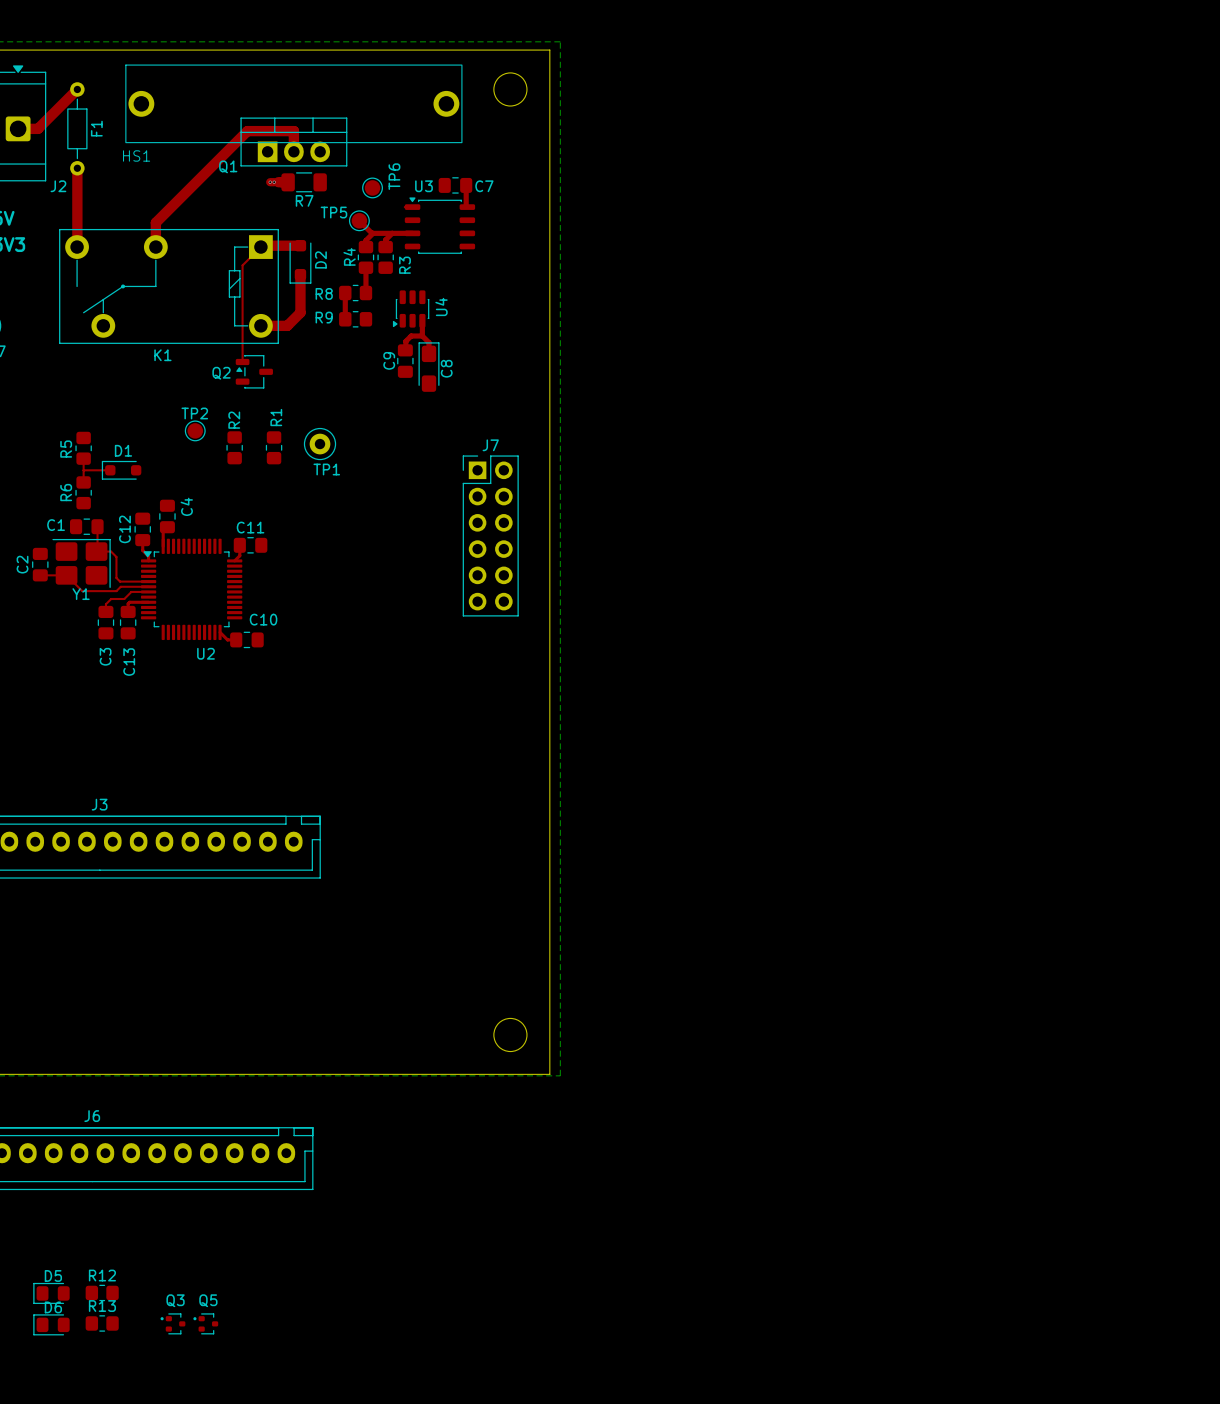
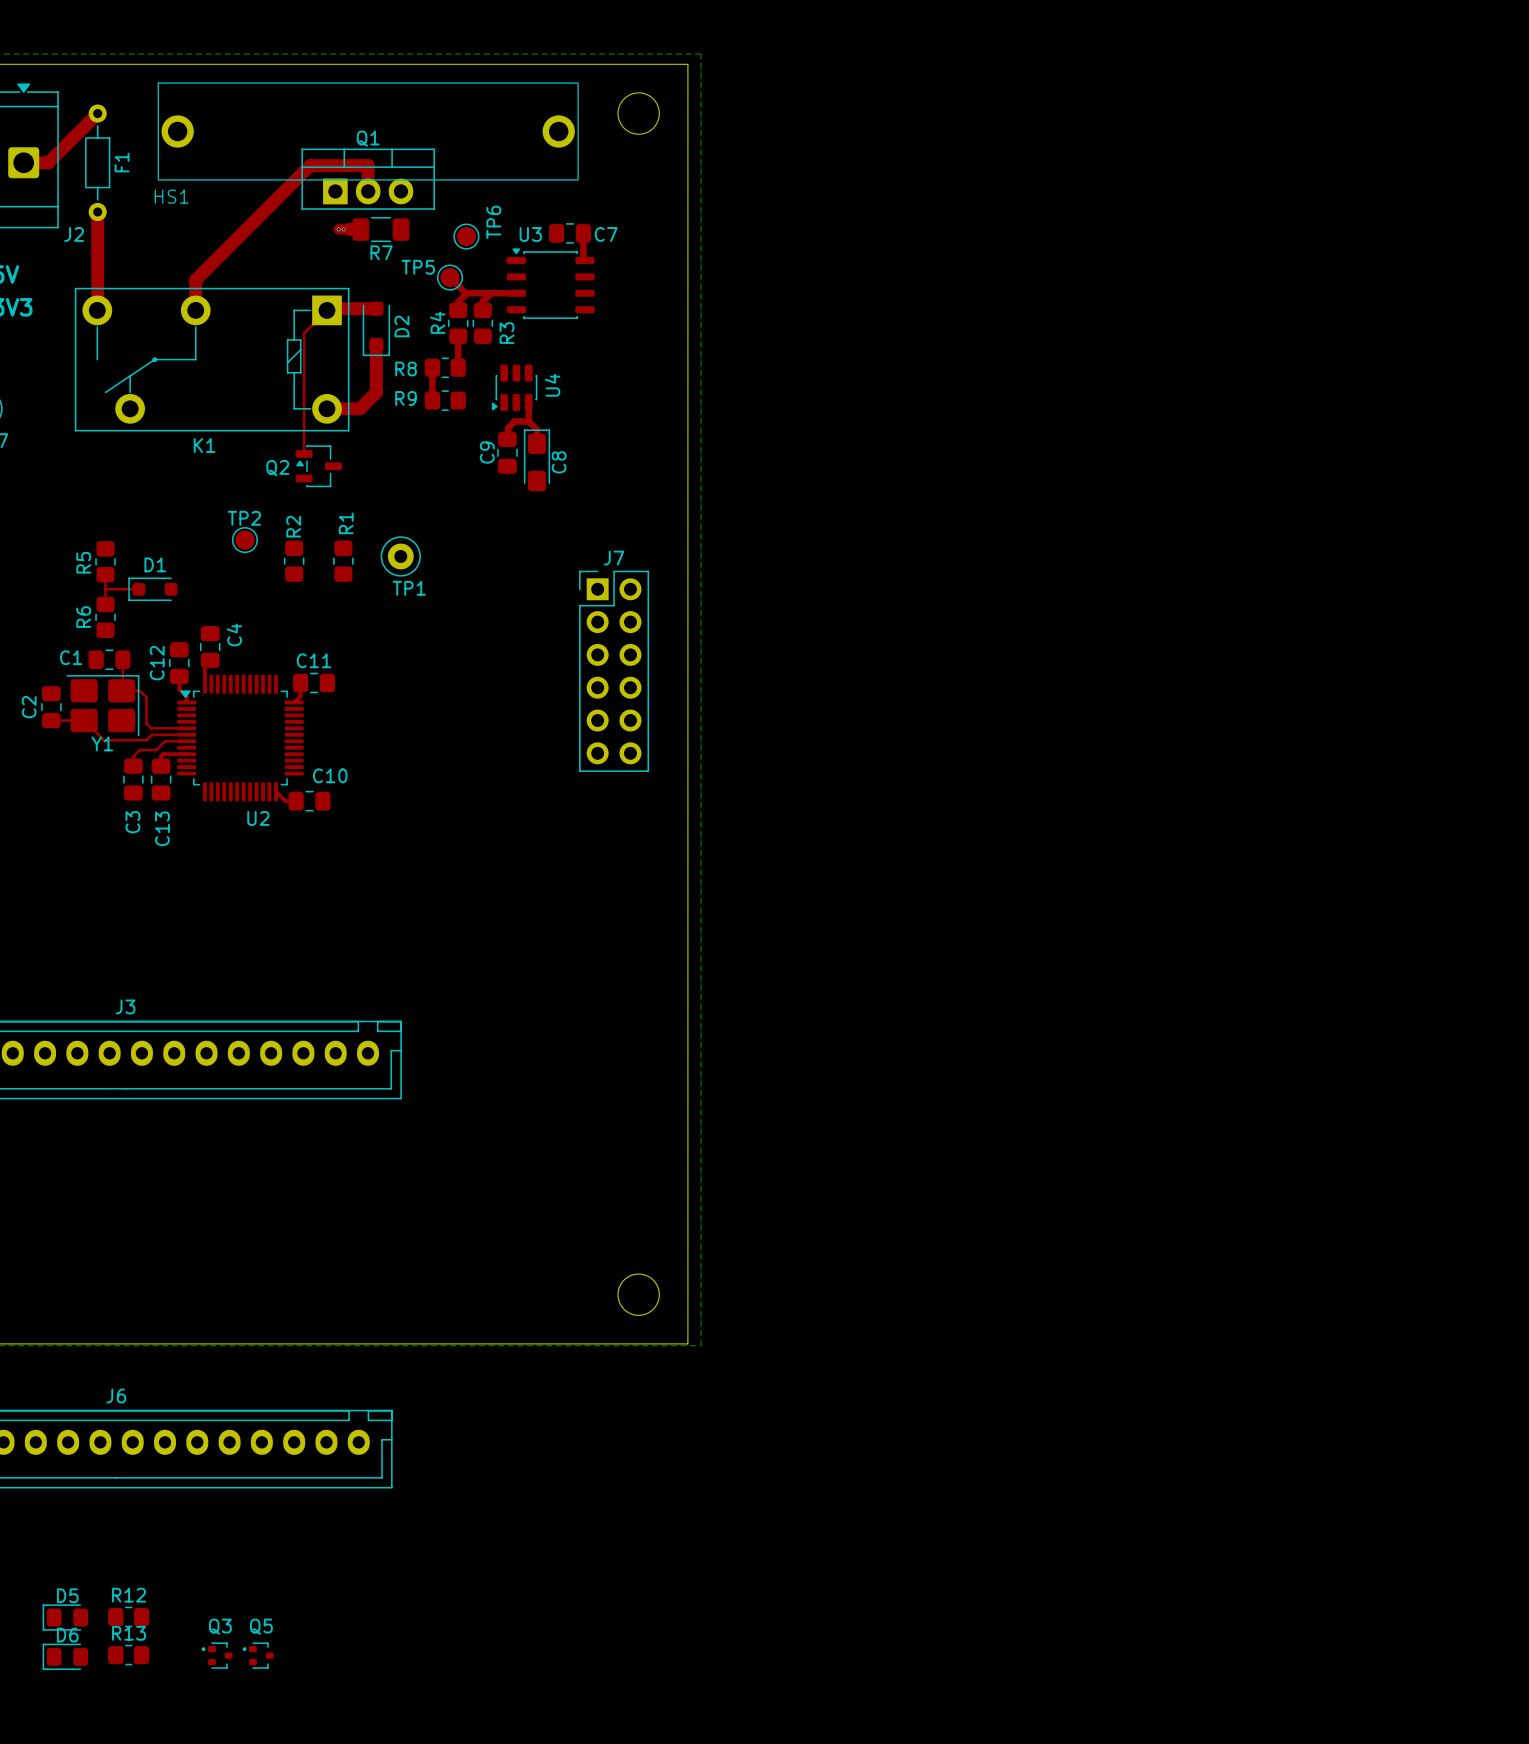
Q1 name position: Q1 (228, 166) -> Q1 (368, 138)

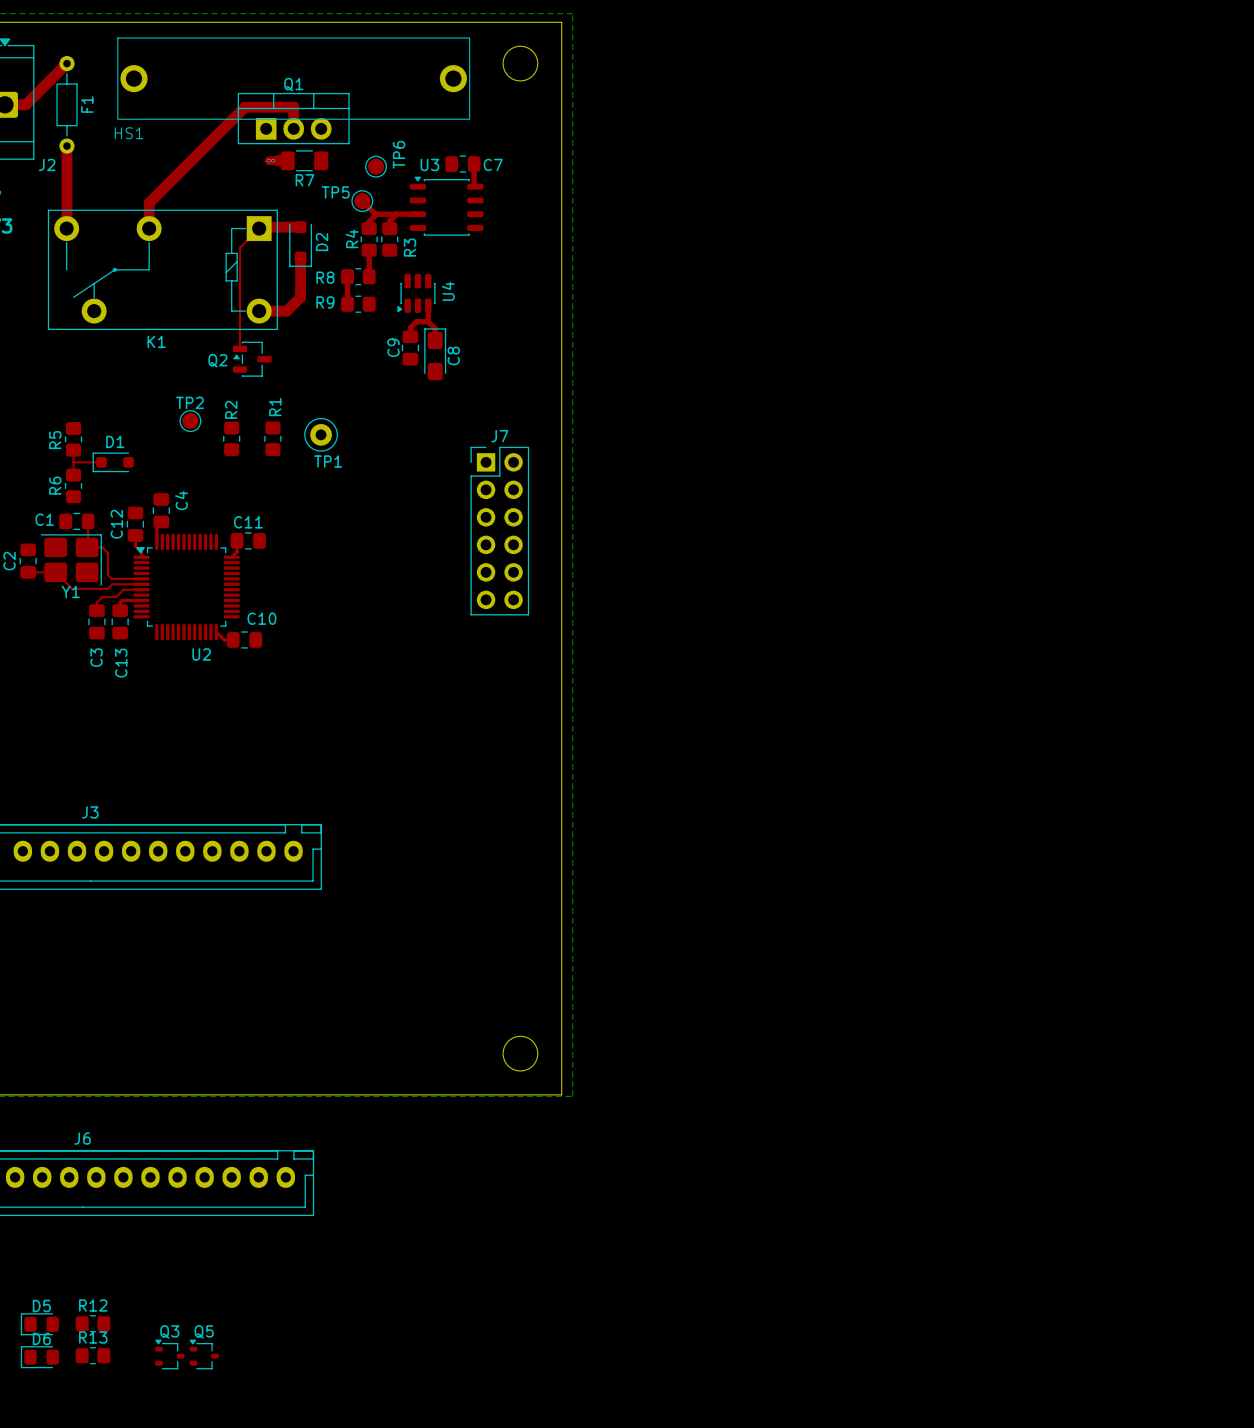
Q3 footprint: [201, 1642, 233, 1669] -> [155, 1339, 185, 1370]
Q5 footprint: [242, 1642, 274, 1669] -> [189, 1339, 219, 1370]

